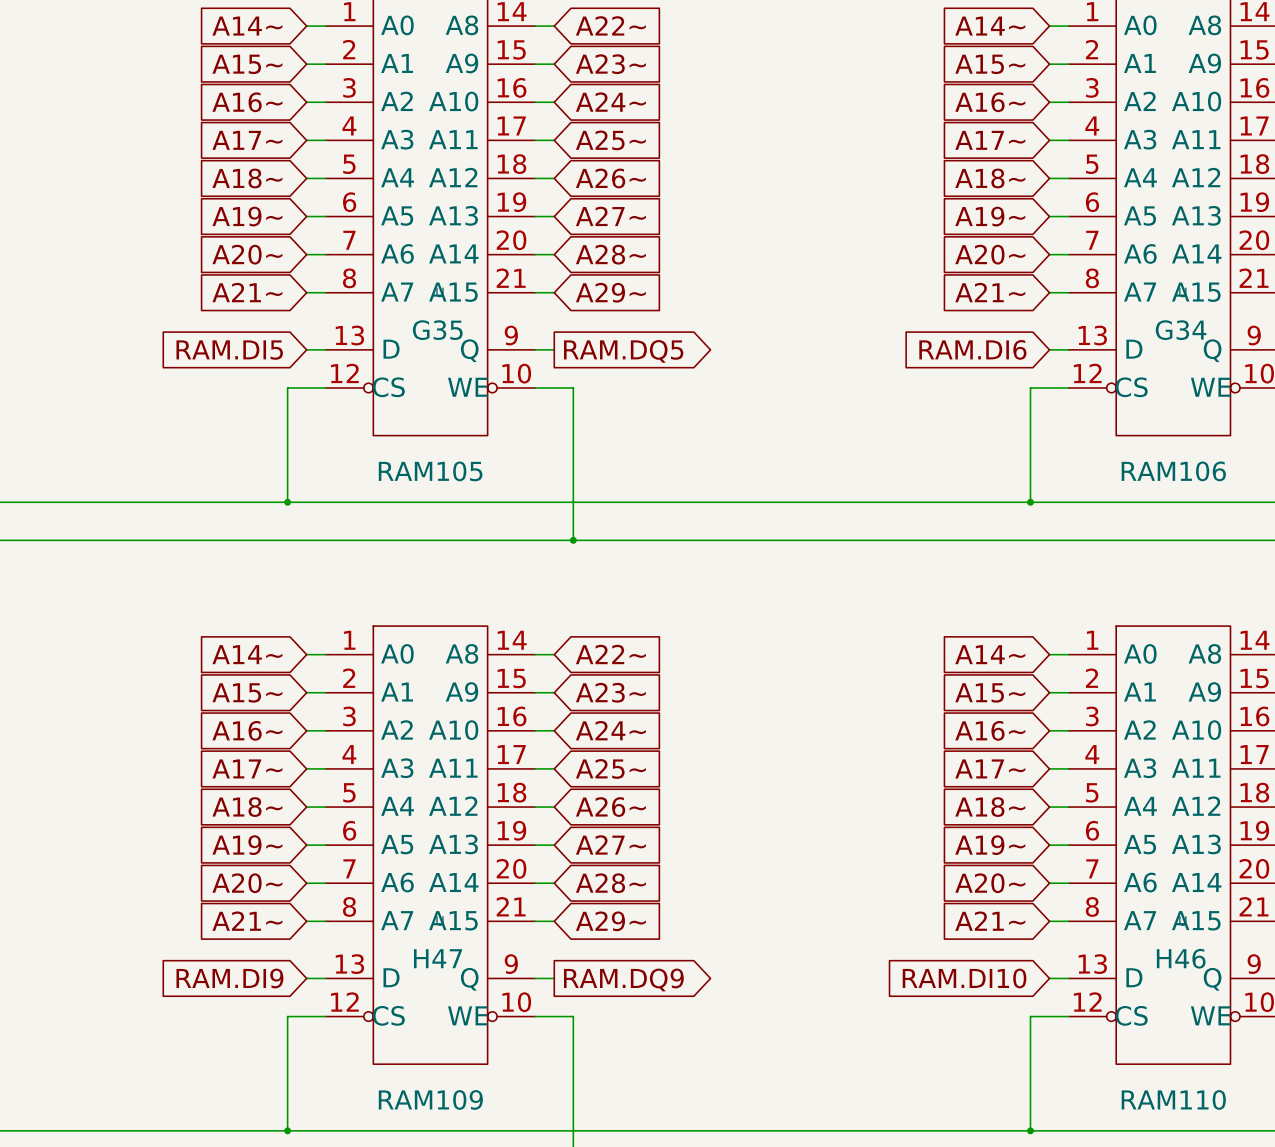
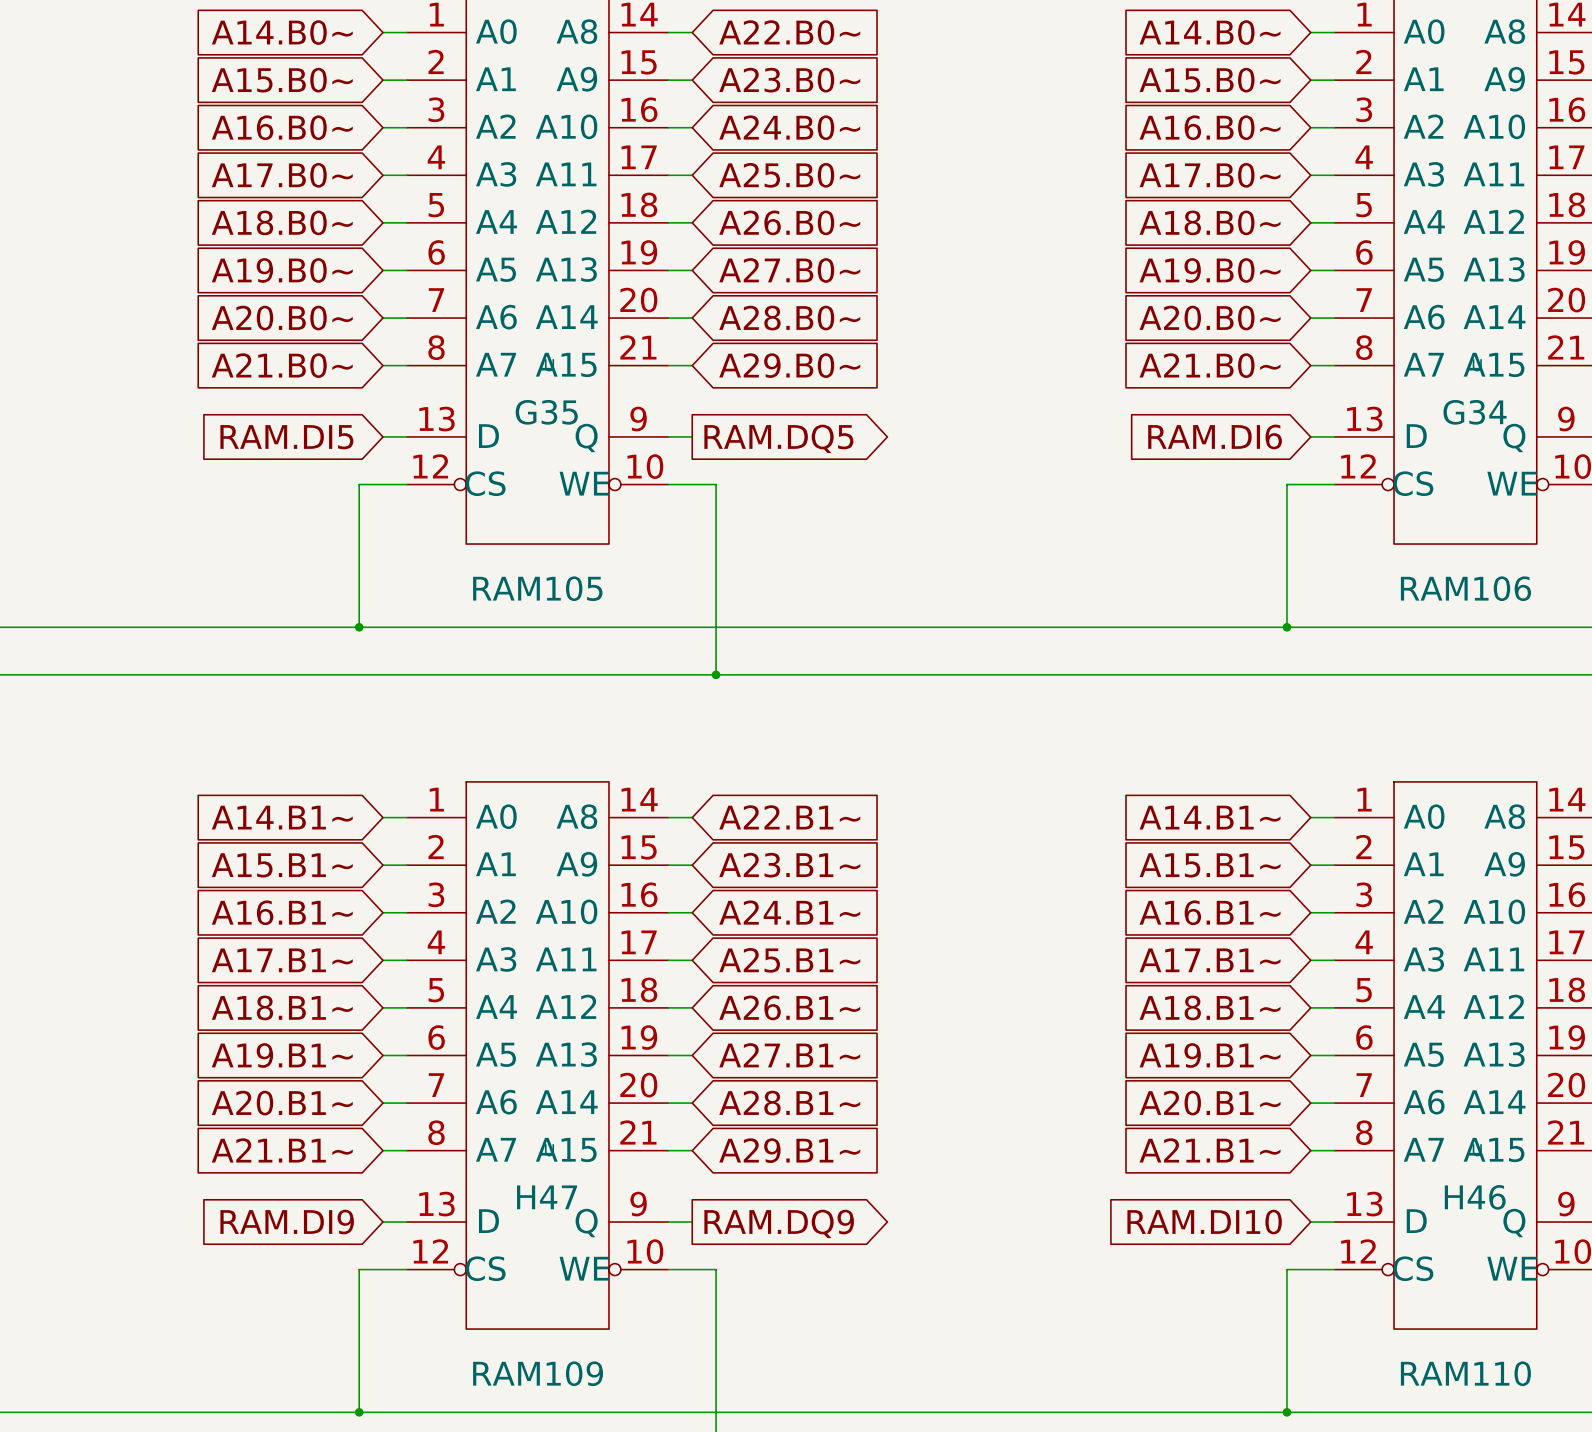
global label: A22~ (610, 25) -> A22.B0~ (789, 32)
global label: A14~ (247, 26) -> A14.B0~ (282, 32)
global label: A14~ (990, 26) -> A14.B0~ (1210, 32)
global label: A15~ (247, 64) -> A15.B0~ (282, 80)
global label: A23~ (610, 64) -> A23.B0~ (789, 80)
global label: A15~ (990, 64) -> A15.B0~ (1210, 80)
global label: A16~ (247, 102) -> A16.B0~ (282, 127)
global label: A24~ (610, 102) -> A24.B0~ (789, 127)
global label: A16~ (990, 102) -> A16.B0~ (1210, 127)
global label: A17~ (247, 140) -> A17.B0~ (282, 175)
global label: A25~ (610, 140) -> A25.B0~ (789, 175)
global label: A17~ (990, 140) -> A17.B0~ (1210, 175)
global label: A18~ (247, 178) -> A18.B0~ (282, 222)
global label: A26~ (610, 178) -> A26.B0~ (789, 222)
global label: A18~ (990, 178) -> A18.B0~ (1210, 222)
global label: A19~ (247, 216) -> A19.B0~ (282, 270)
global label: A27~ (610, 216) -> A27.B0~ (789, 270)
global label: A19~ (990, 216) -> A19.B0~ (1210, 270)
global label: A20~ (247, 254) -> A20.B0~ (282, 318)
global label: A28~ (610, 254) -> A28.B0~ (789, 318)
global label: A20~ (990, 254) -> A20.B0~ (1210, 318)
global label: A21~ (247, 292) -> A21.B0~ (282, 365)
global label: A29~ (610, 292) -> A29.B0~ (789, 365)
global label: A21~ (990, 292) -> A21.B0~ (1210, 365)
global label: A14~ (247, 654) -> A14.B1~ (282, 817)
global label: A22~ (610, 654) -> A22.B1~ (789, 817)
global label: A14~ (990, 654) -> A14.B1~ (1210, 817)
global label: A15~ (247, 692) -> A15.B1~ (282, 865)
global label: A23~ (610, 692) -> A23.B1~ (789, 865)
global label: A15~ (990, 692) -> A15.B1~ (1210, 865)
global label: A16~ (247, 730) -> A16.B1~ (282, 912)
global label: A24~ (610, 730) -> A24.B1~ (789, 912)
global label: A16~ (990, 730) -> A16.B1~ (1210, 912)
global label: A17~ (247, 768) -> A17.B1~ (282, 960)
global label: A25~ (610, 768) -> A25.B1~ (789, 960)
global label: A17~ (990, 768) -> A17.B1~ (1210, 960)
global label: A18~ (247, 807) -> A18.B1~ (282, 1007)
global label: A26~ (610, 807) -> A26.B1~ (789, 1007)
global label: A18~ (990, 807) -> A18.B1~ (1210, 1007)
global label: A27~ (610, 844) -> A27.B1~ (789, 1055)
global label: A19~ (247, 845) -> A19.B1~ (282, 1055)
global label: A19~ (990, 845) -> A19.B1~ (1210, 1055)
global label: A20~ (247, 883) -> A20.B1~ (282, 1103)
global label: A28~ (610, 883) -> A28.B1~ (789, 1103)
global label: A20~ (990, 883) -> A20.B1~ (1210, 1103)
global label: A21~ (247, 921) -> A21.B1~ (282, 1150)
global label: A29~ (610, 921) -> A29.B1~ (789, 1150)
global label: A21~ (990, 921) -> A21.B1~ (1210, 1150)

